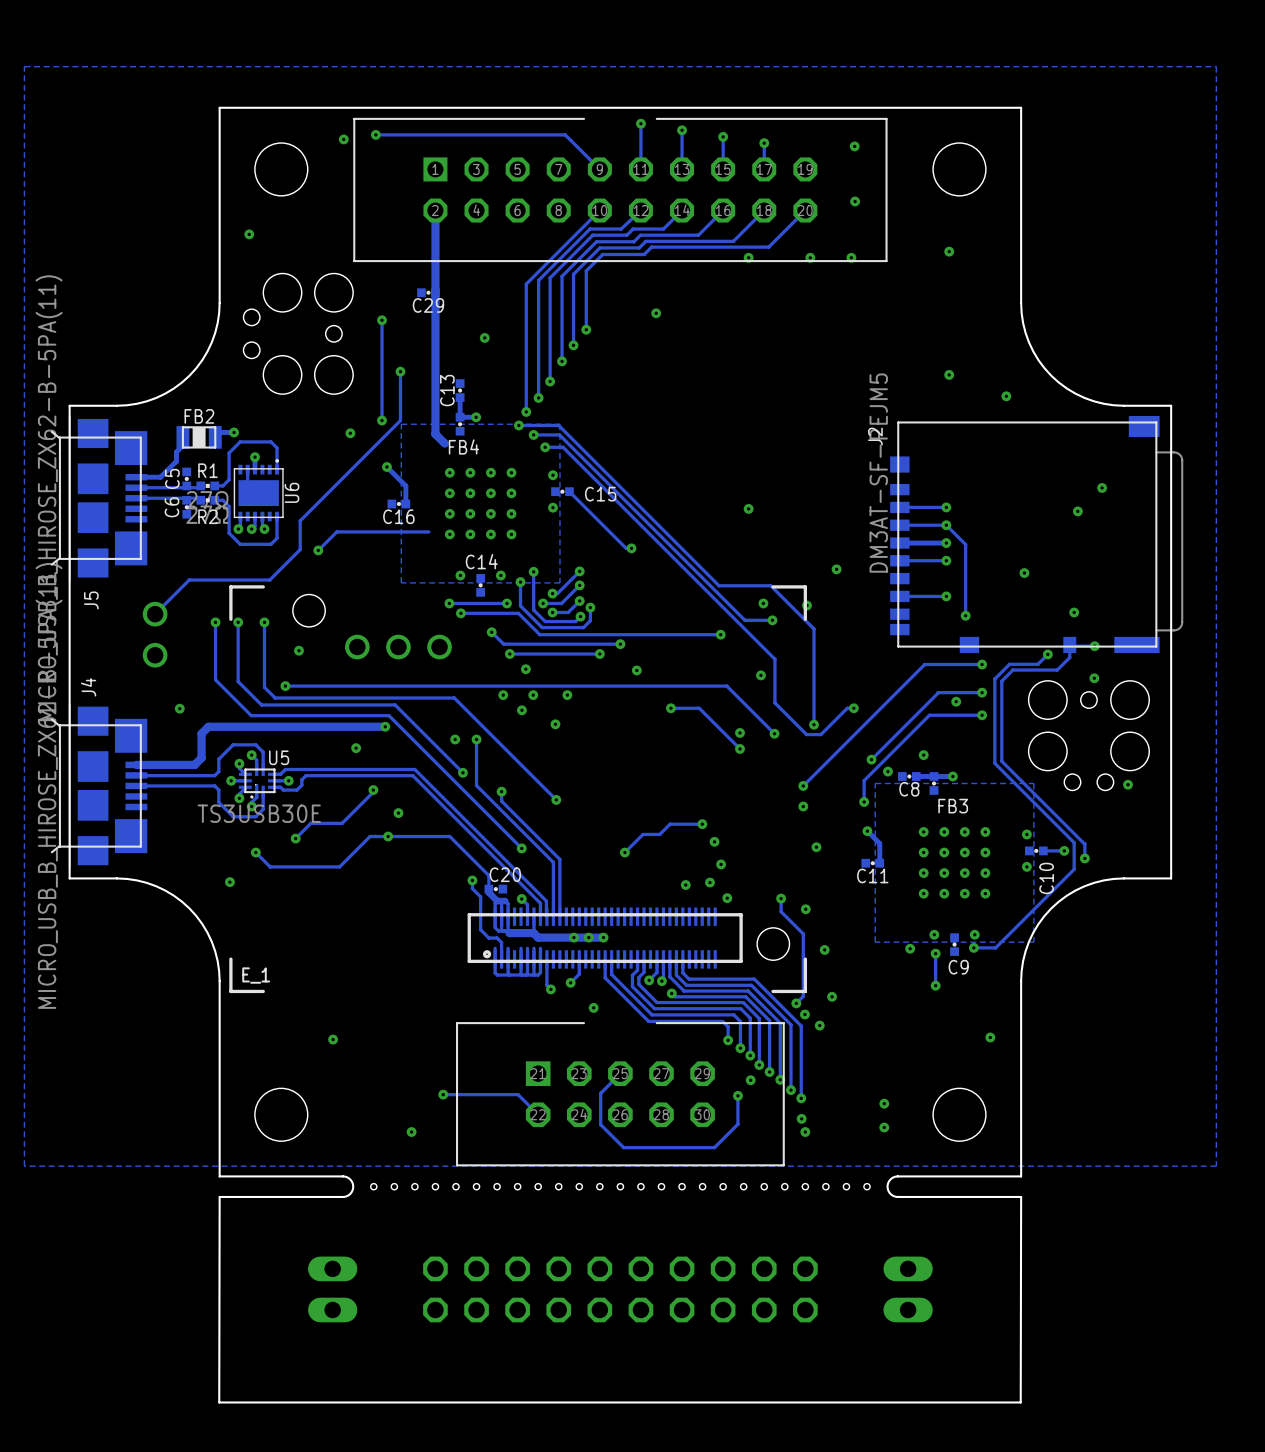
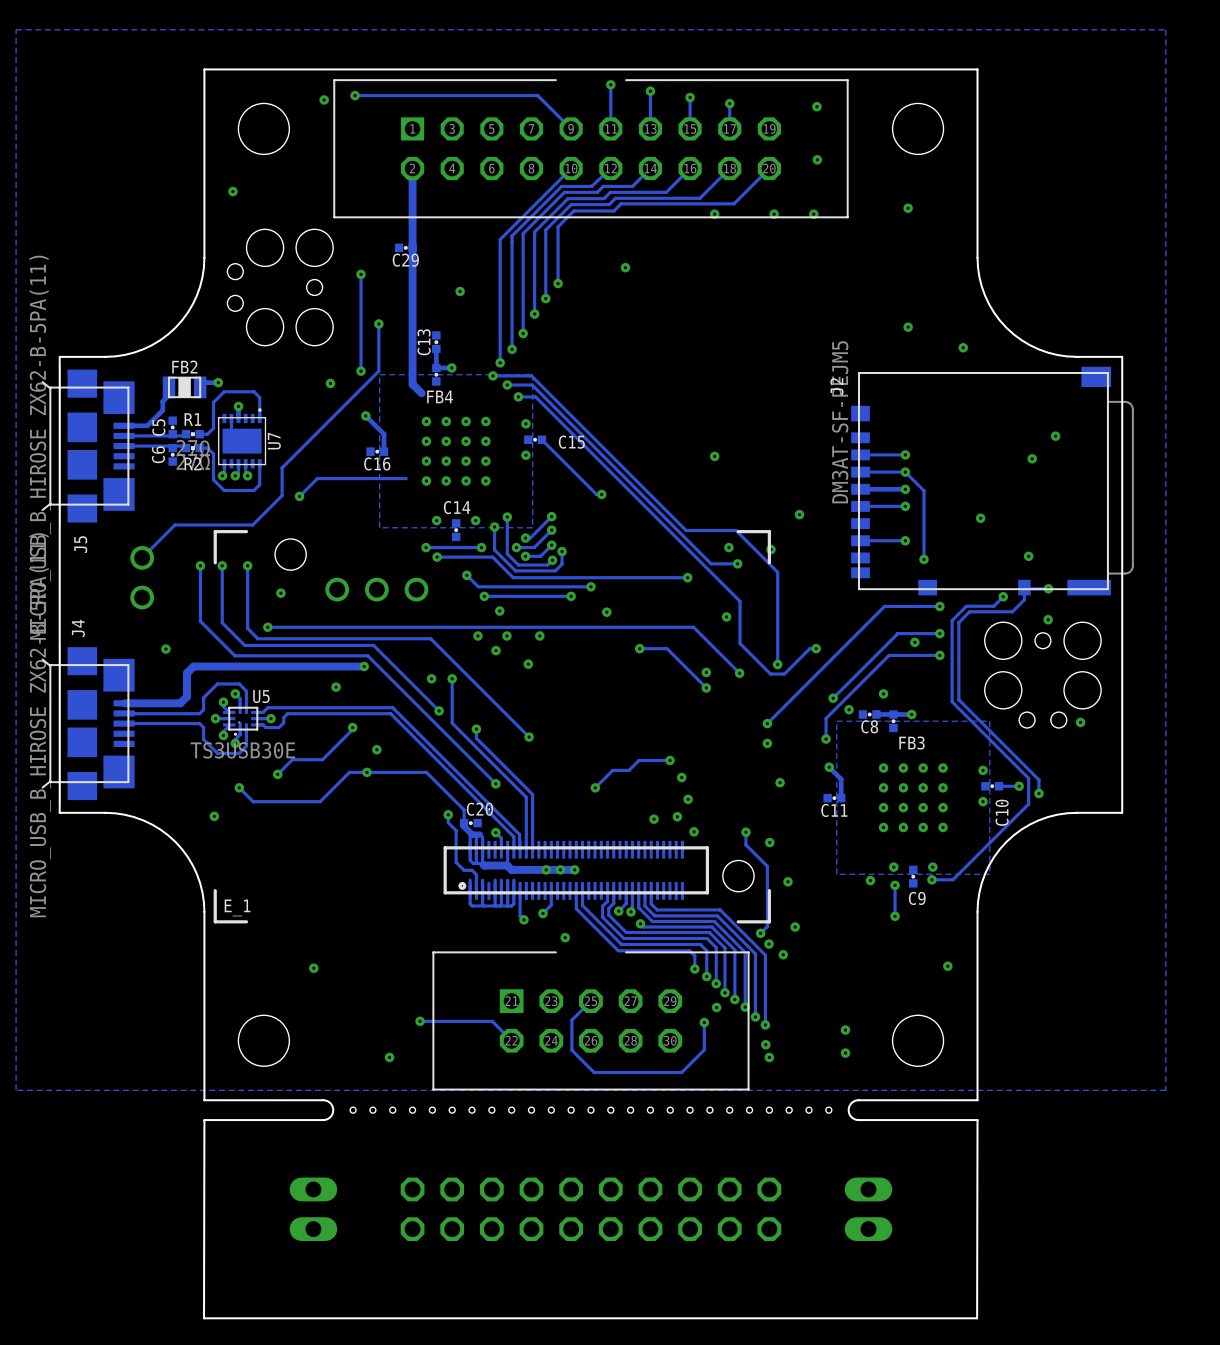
U6 name: U6 (291, 492) -> U7 (274, 441)

